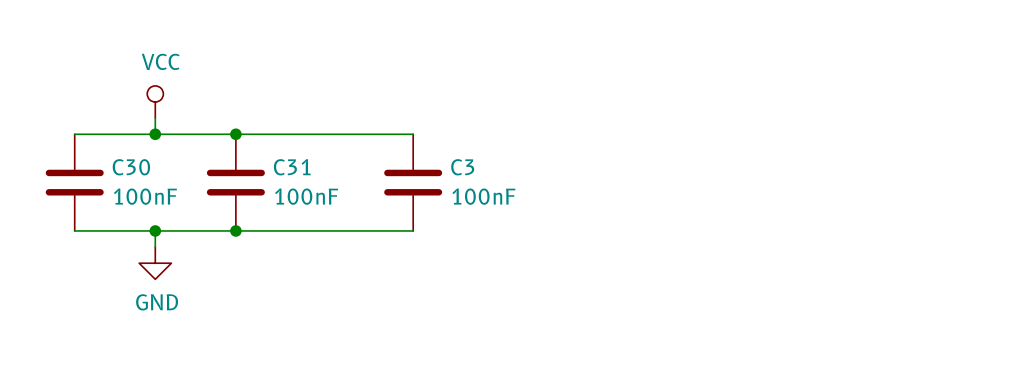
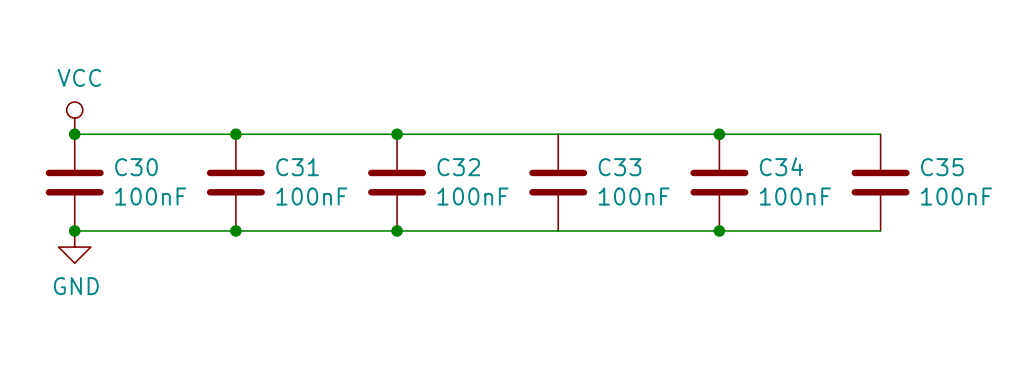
power symbol position: VCC (155, 102) -> VCC (74, 118)
wire: (155, 118) (155, 134) -> none
junction: none -> (74, 134)
junction: (155, 134) -> none
junction: none -> (397, 134)
wire: none -> (413, 134) (880, 134)
junction: none -> (719, 134)
C32: none -> 100nF (397, 182)
C3: 100nF (413, 182) -> none
C33: none -> 100nF (558, 182)
C34: none -> 100nF (719, 182)
C35: none -> 100nF (880, 182)
junction: none -> (74, 230)
wire: (155, 230) (155, 247) -> none
junction: (155, 230) -> none
junction: none -> (397, 230)
wire: none -> (413, 230) (880, 230)
junction: none -> (719, 230)
power symbol position: GND (155, 263) -> GND (74, 247)

